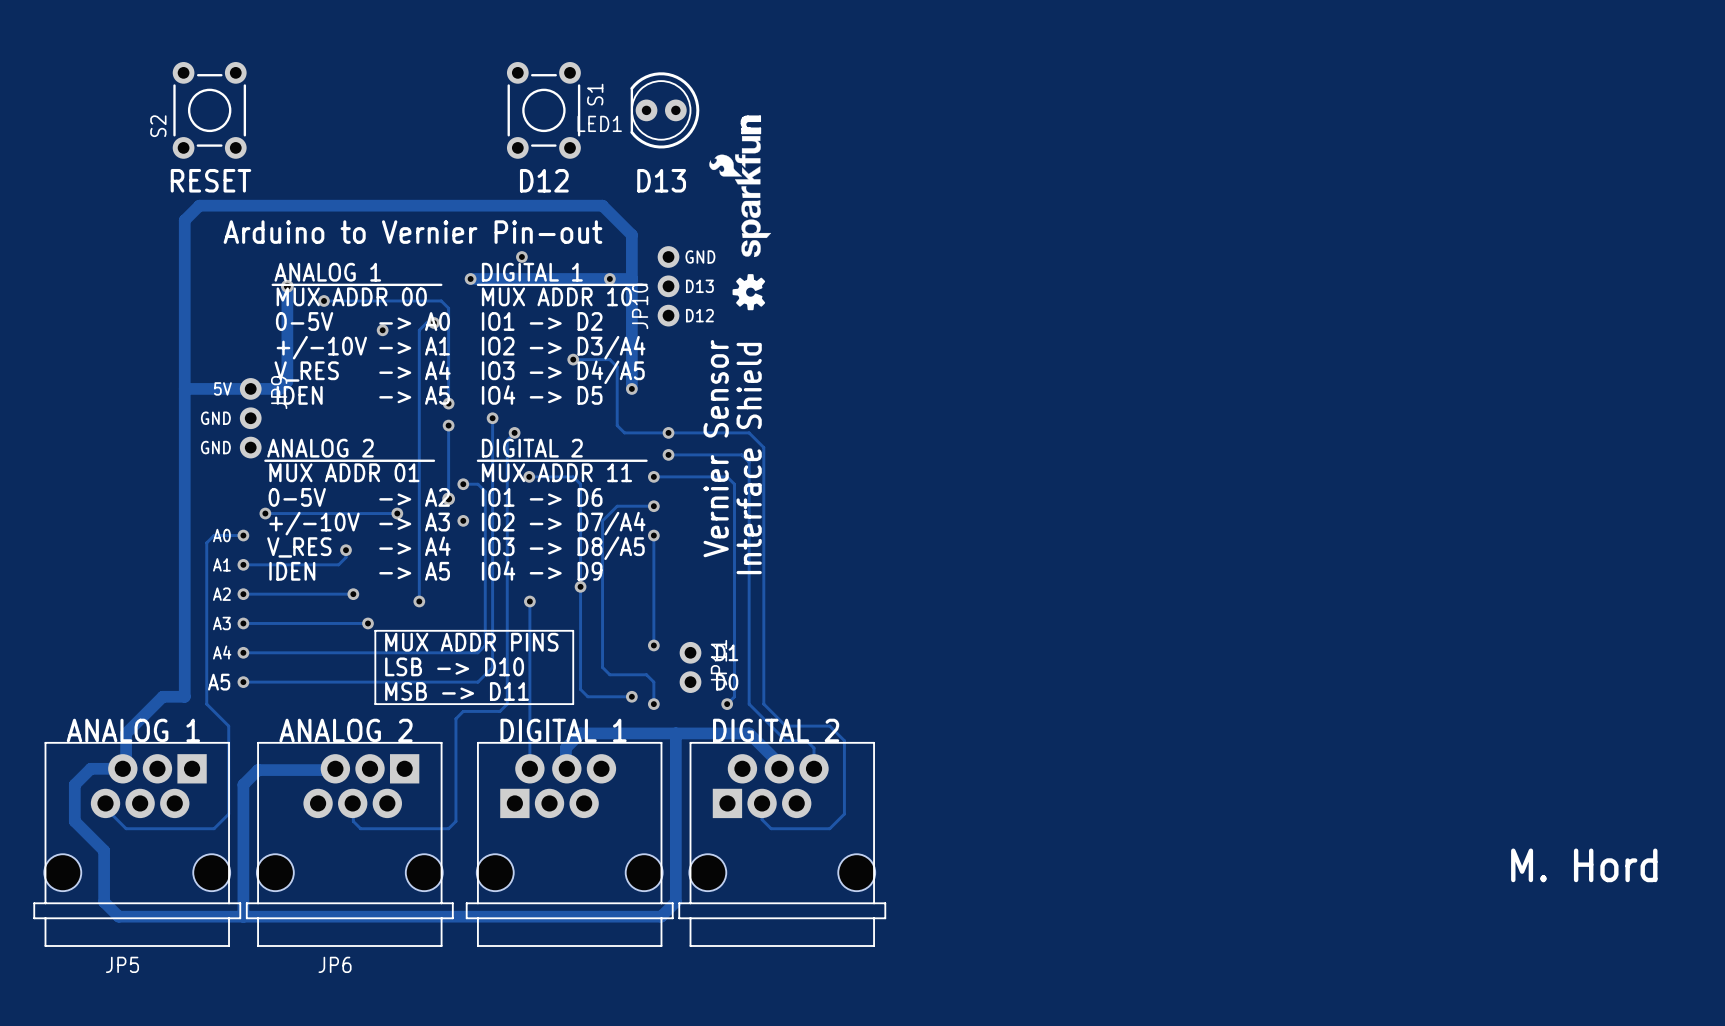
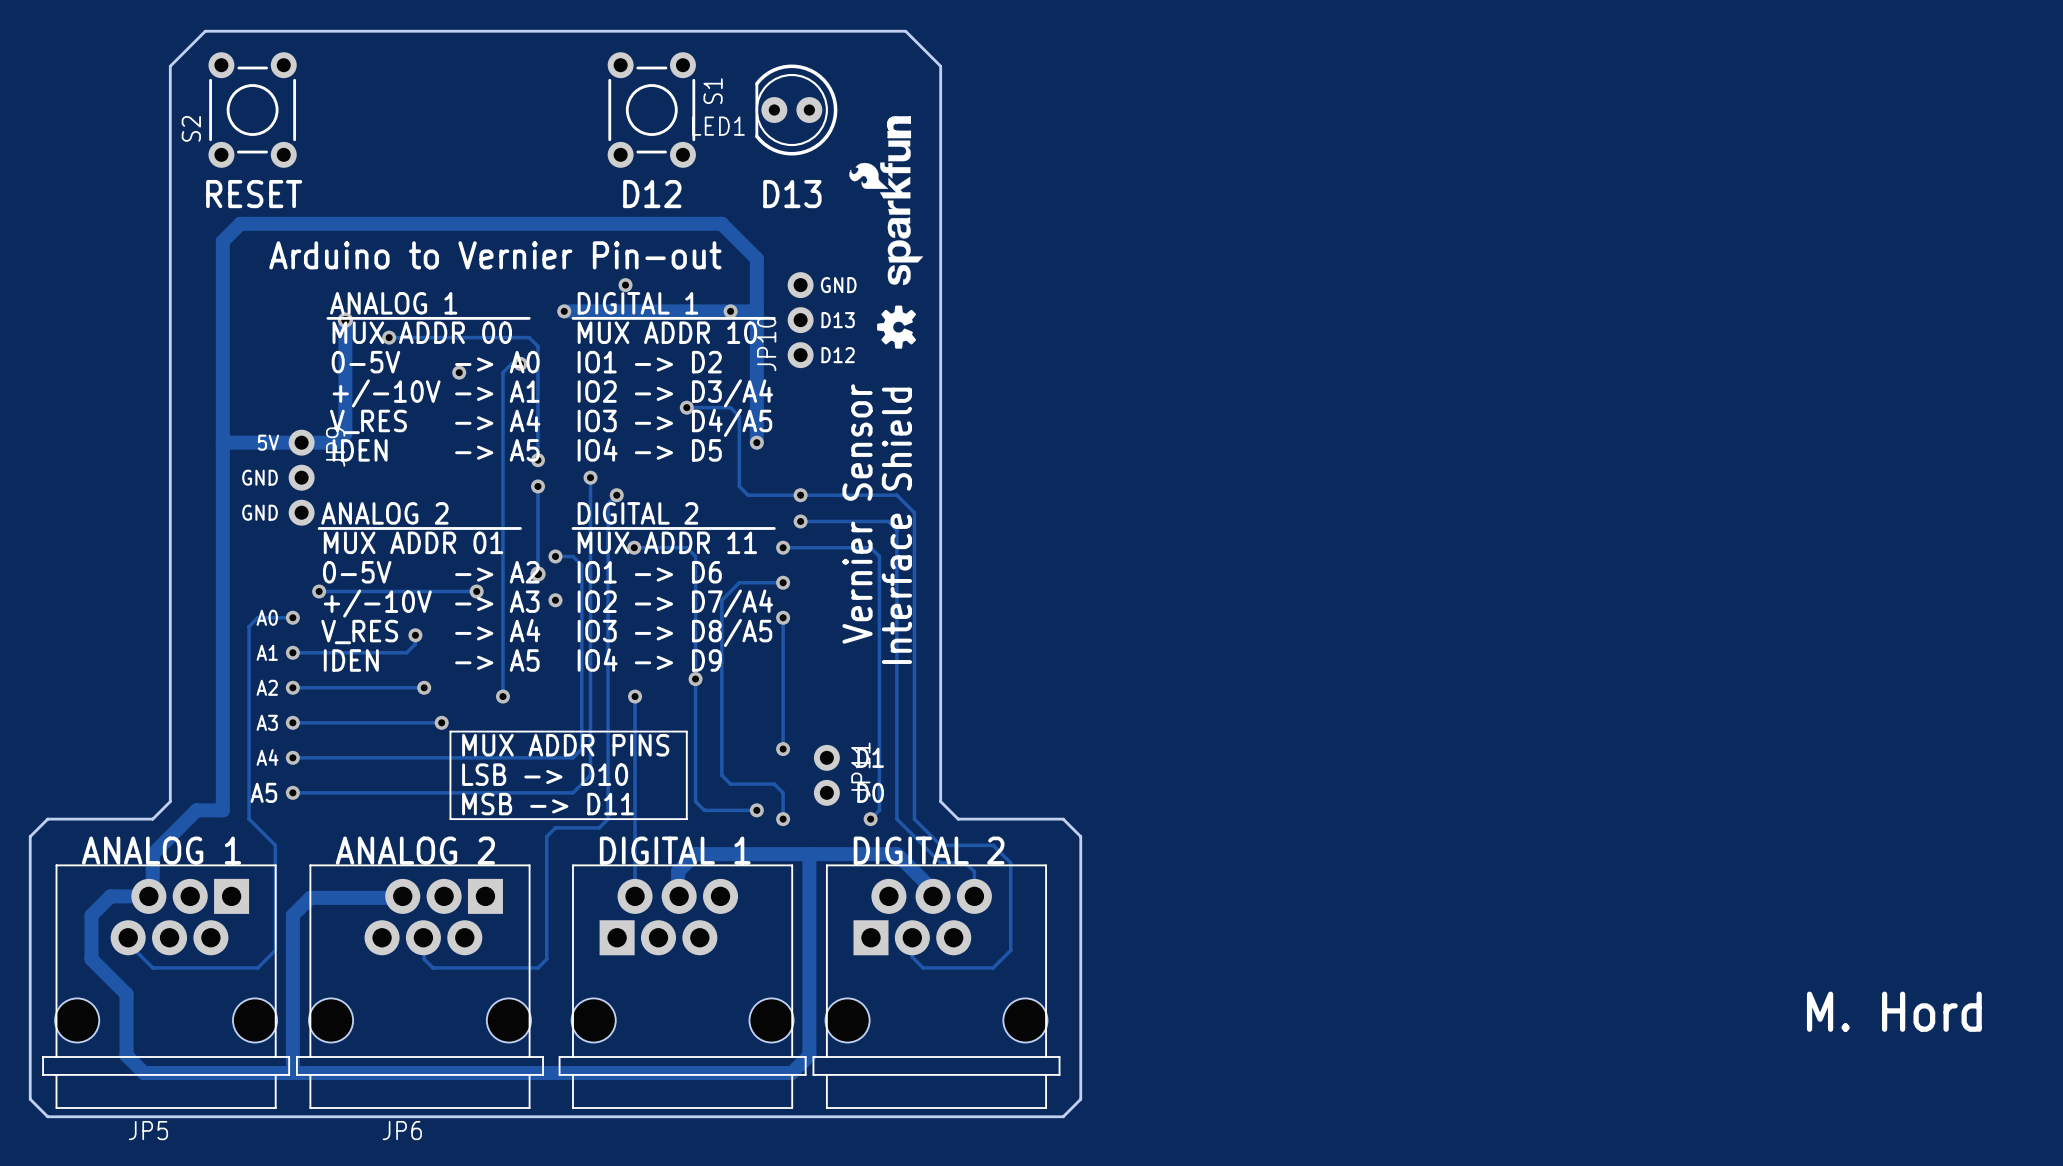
board edge: none -> (205, 31) (170, 66) (170, 801) (152, 819) (47, 819) (30, 836) (30, 1099) (47, 1116) (1063, 1116) (1080, 1099) (1080, 836) (1063, 819) (958, 819) (940, 801) (940, 66) (905, 31) (205, 31)

